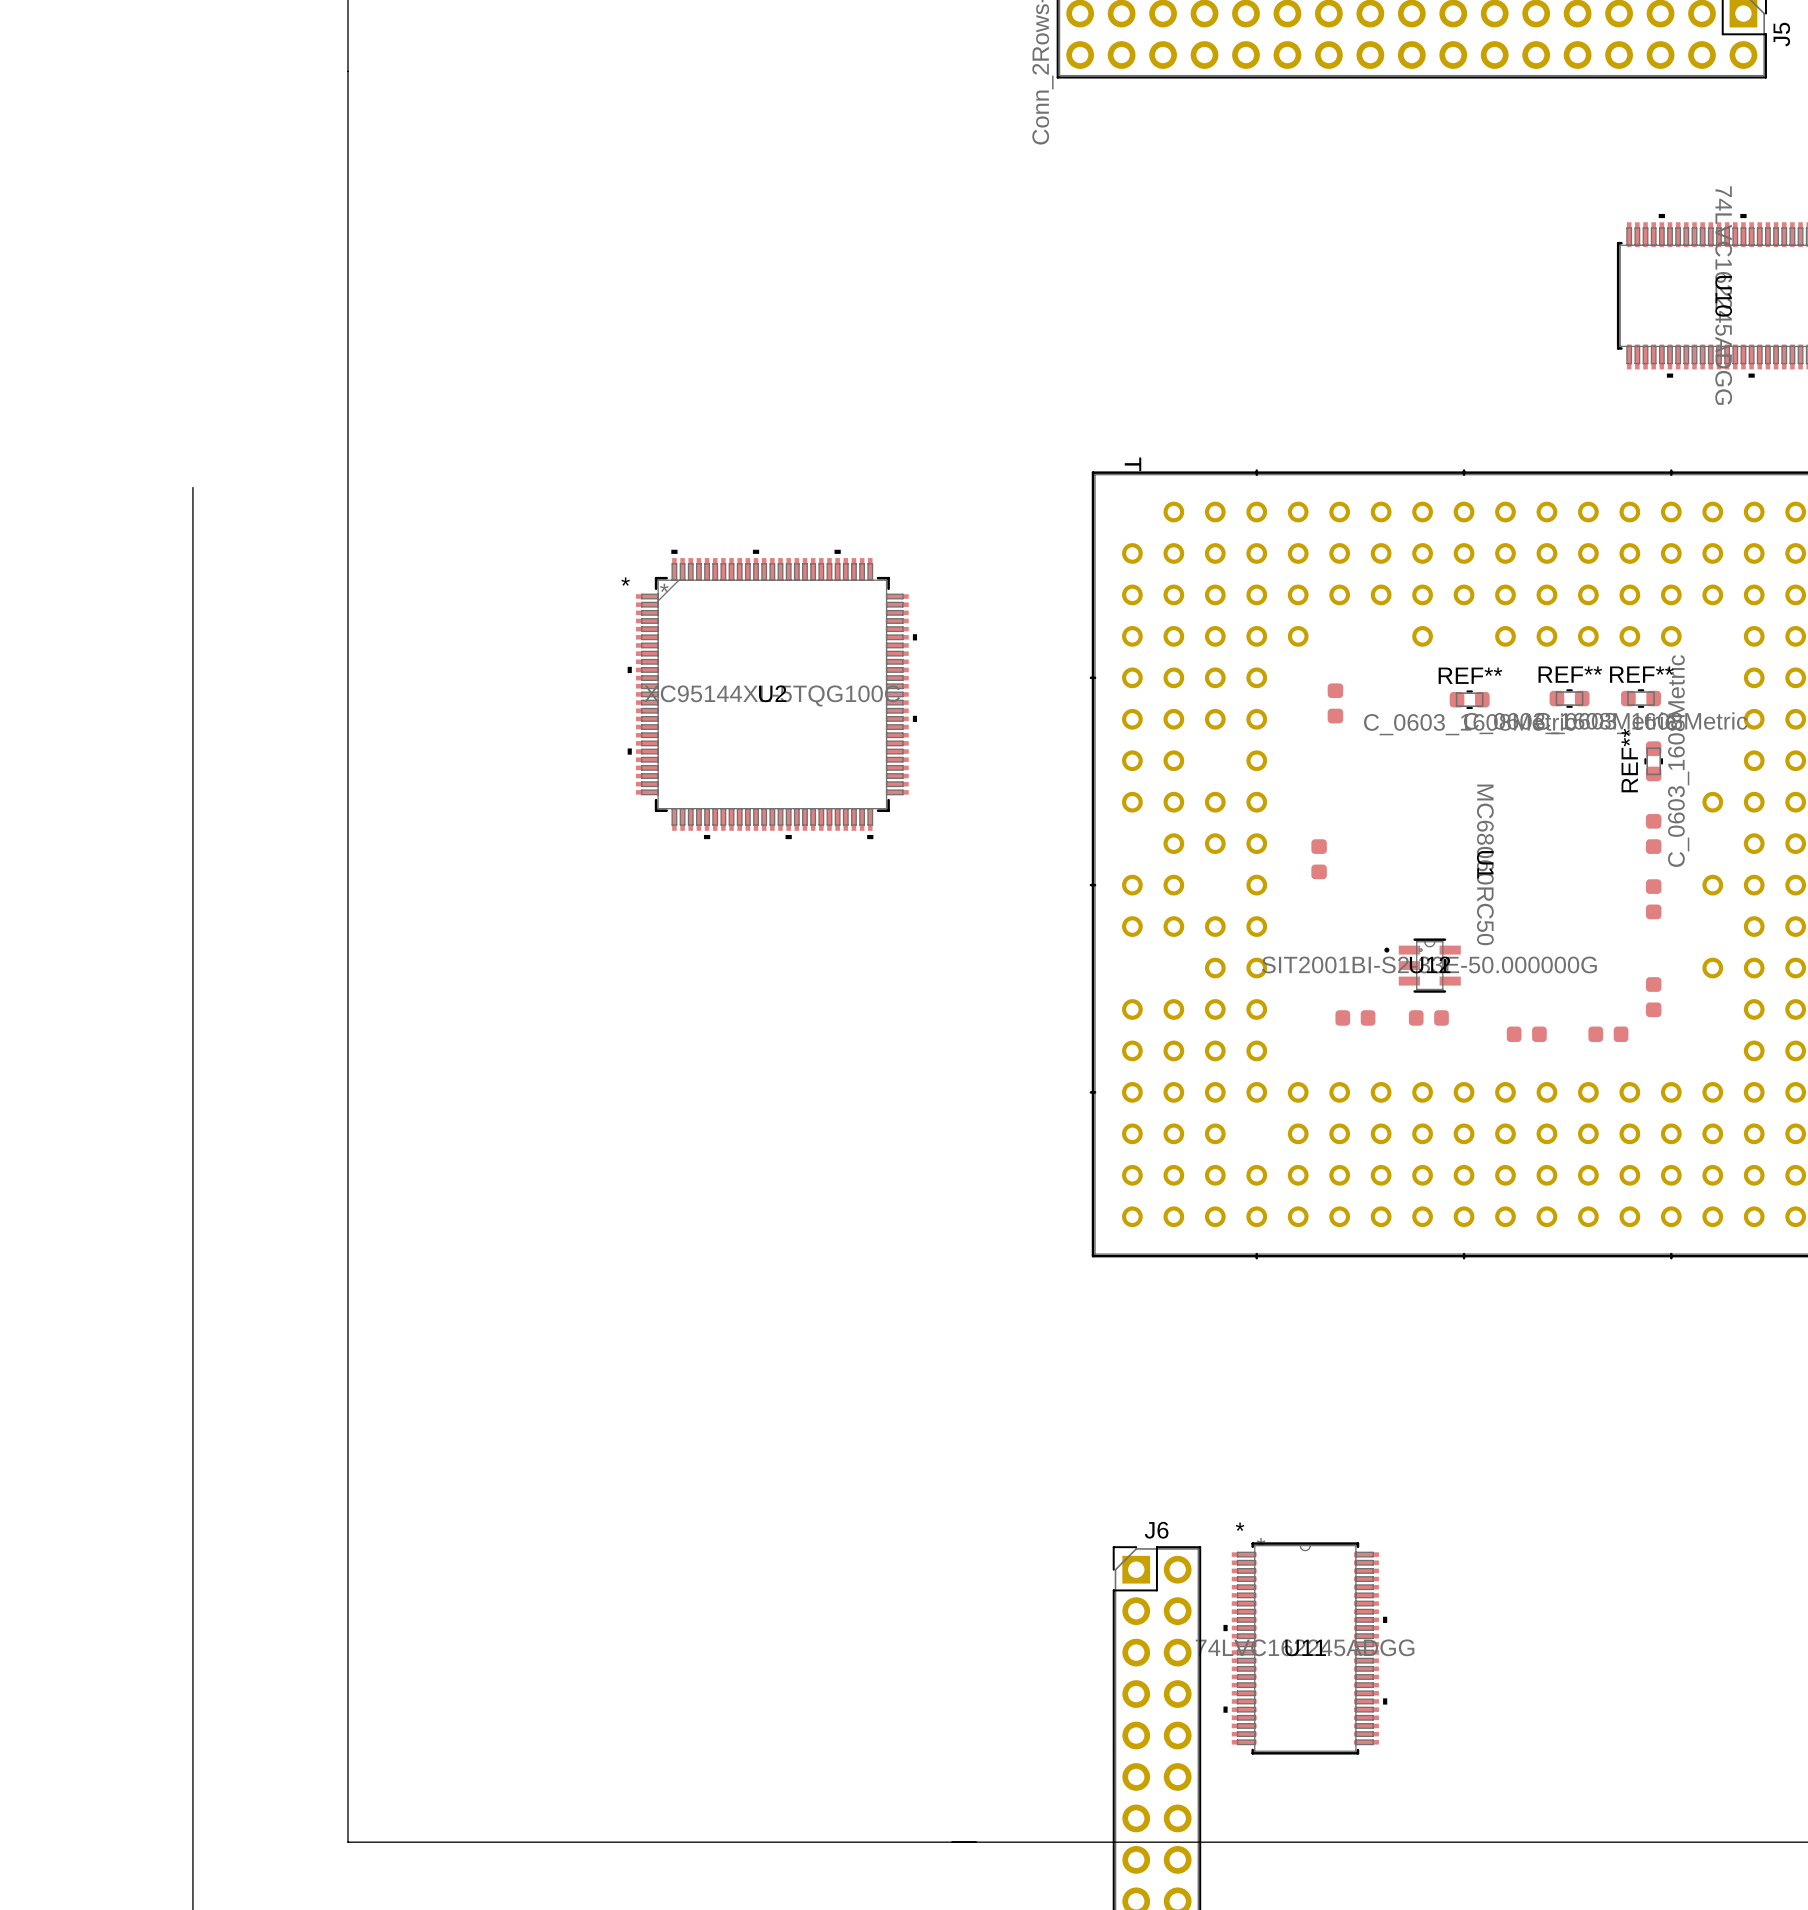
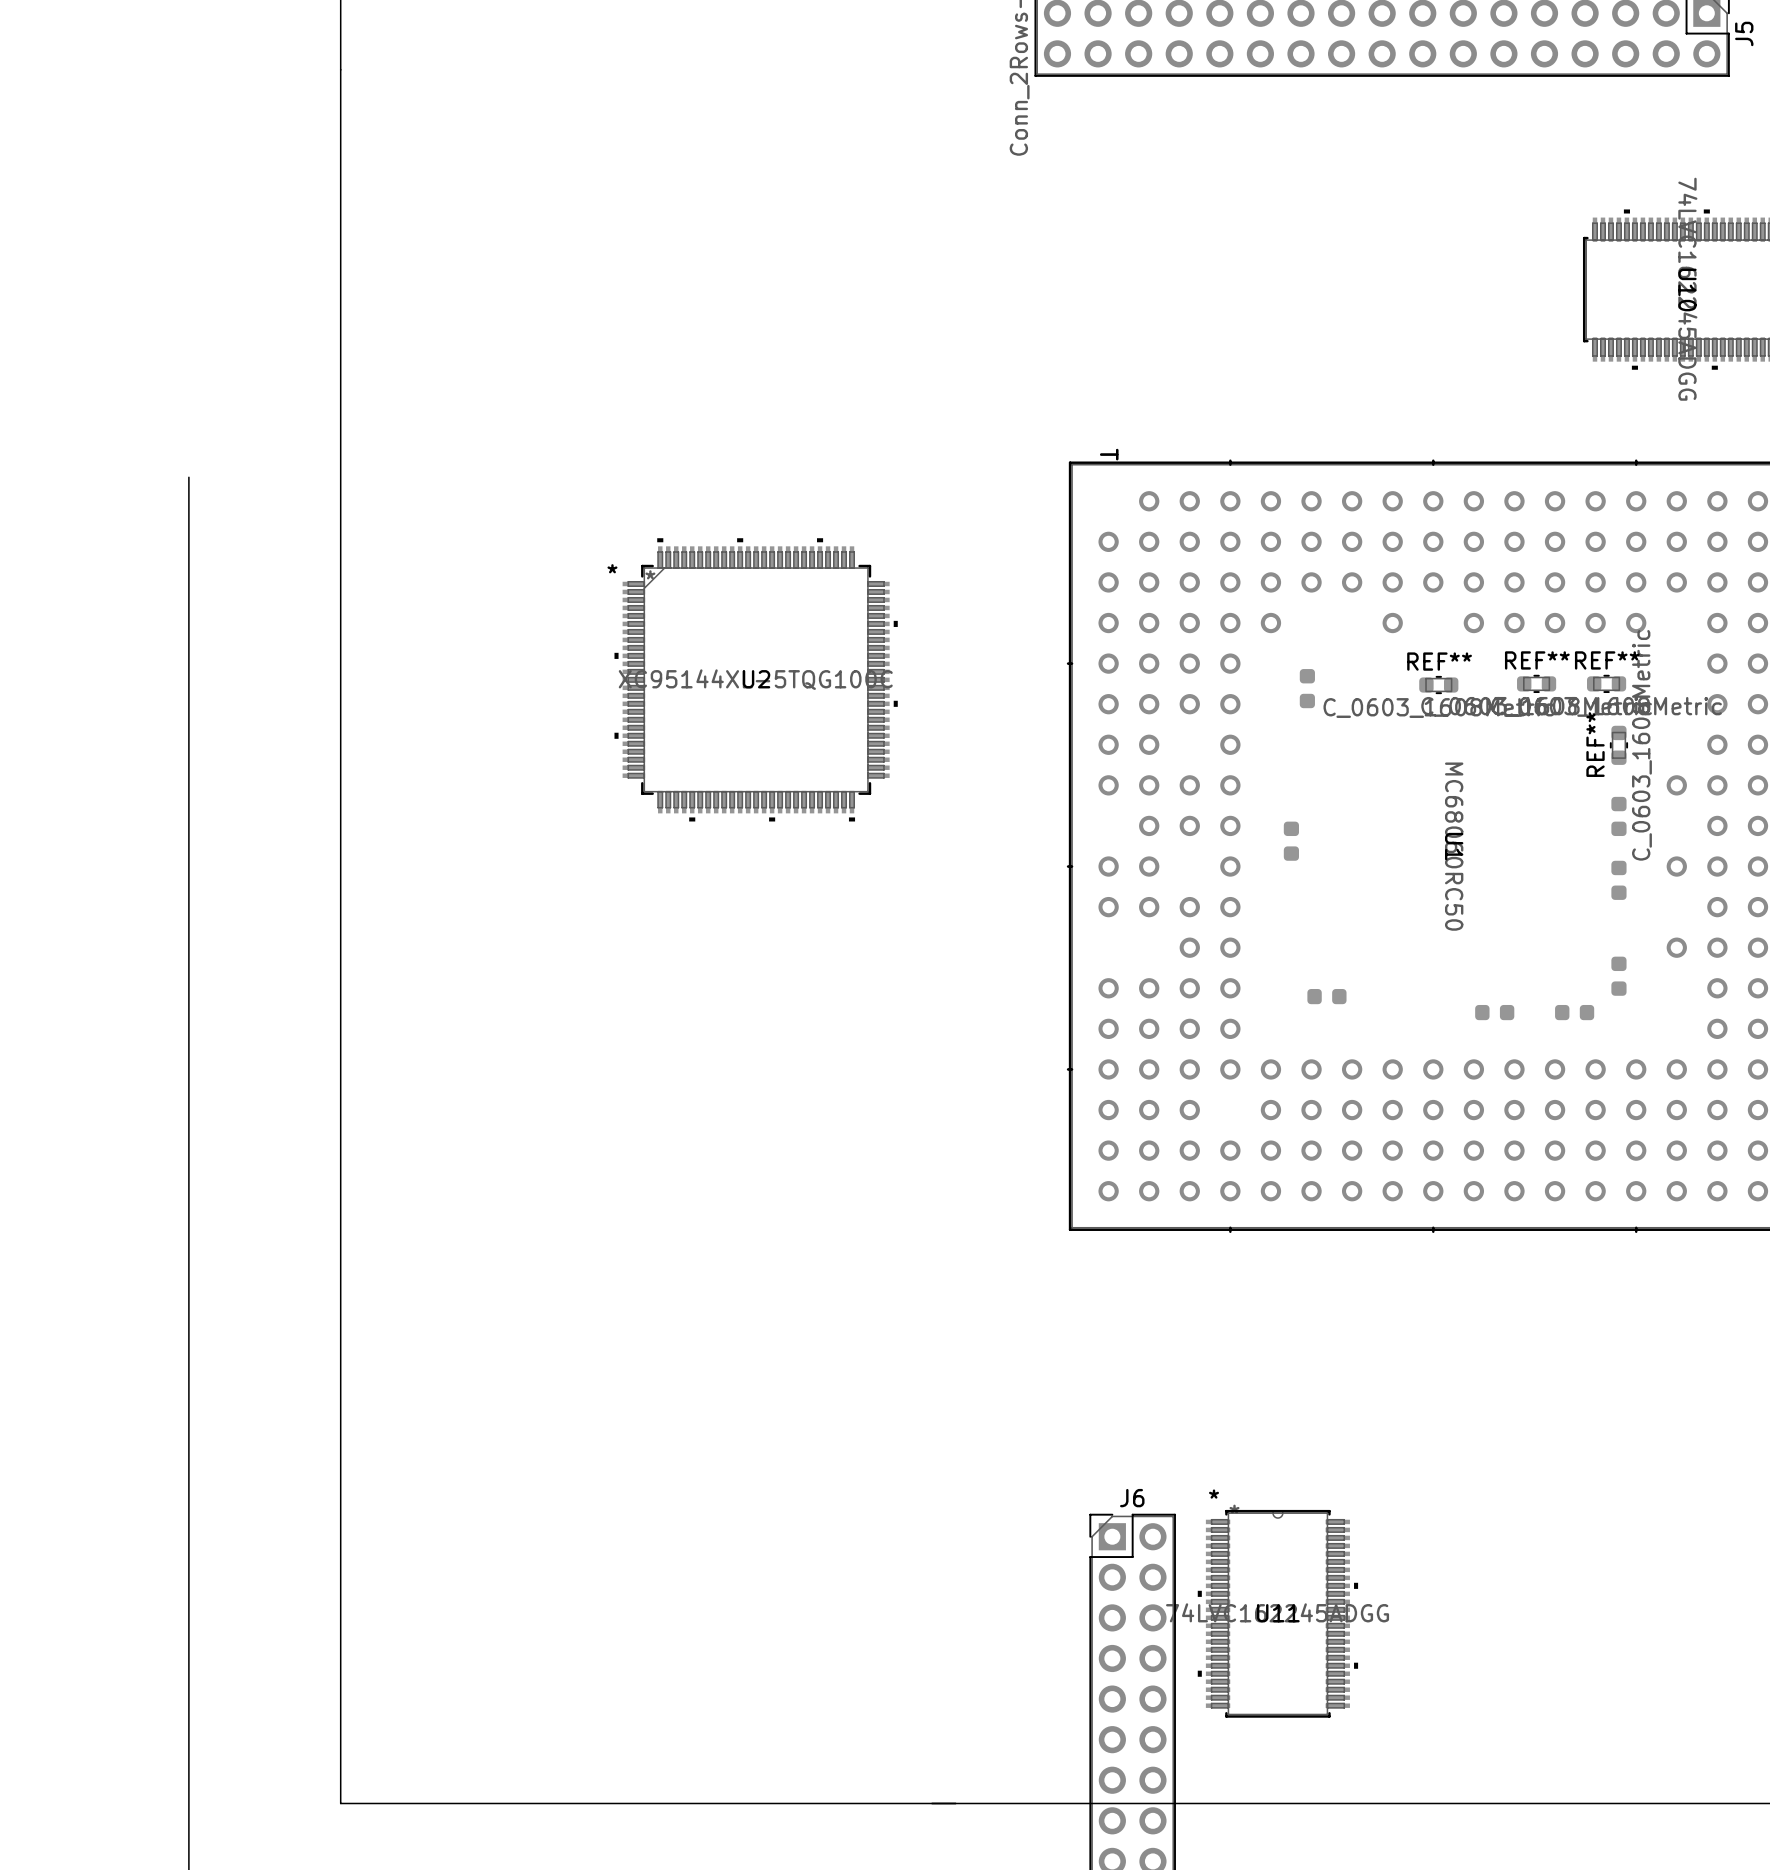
U12: SIT2001BI-S2-33E-50.000000G (1422, 965) -> none
part: (1416, 1017) -> none
part: (1441, 1017) -> none

